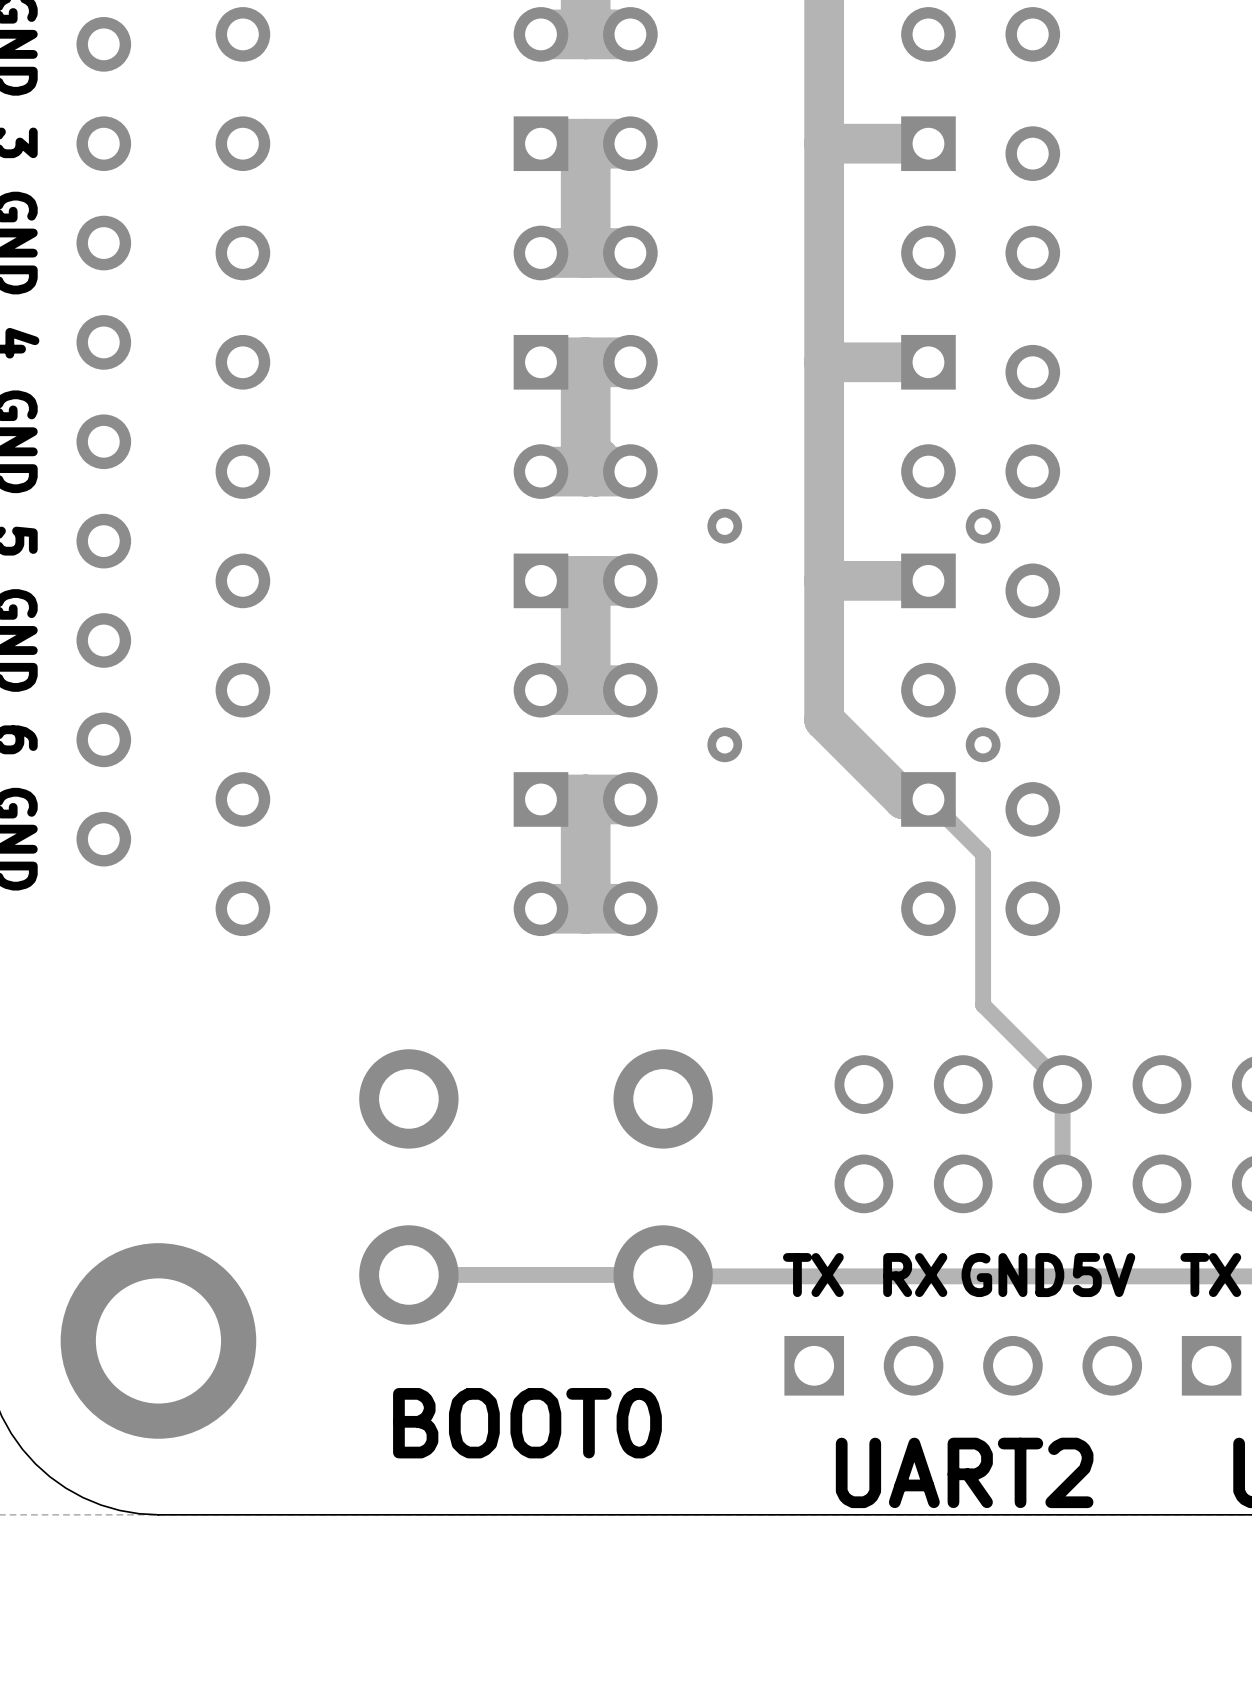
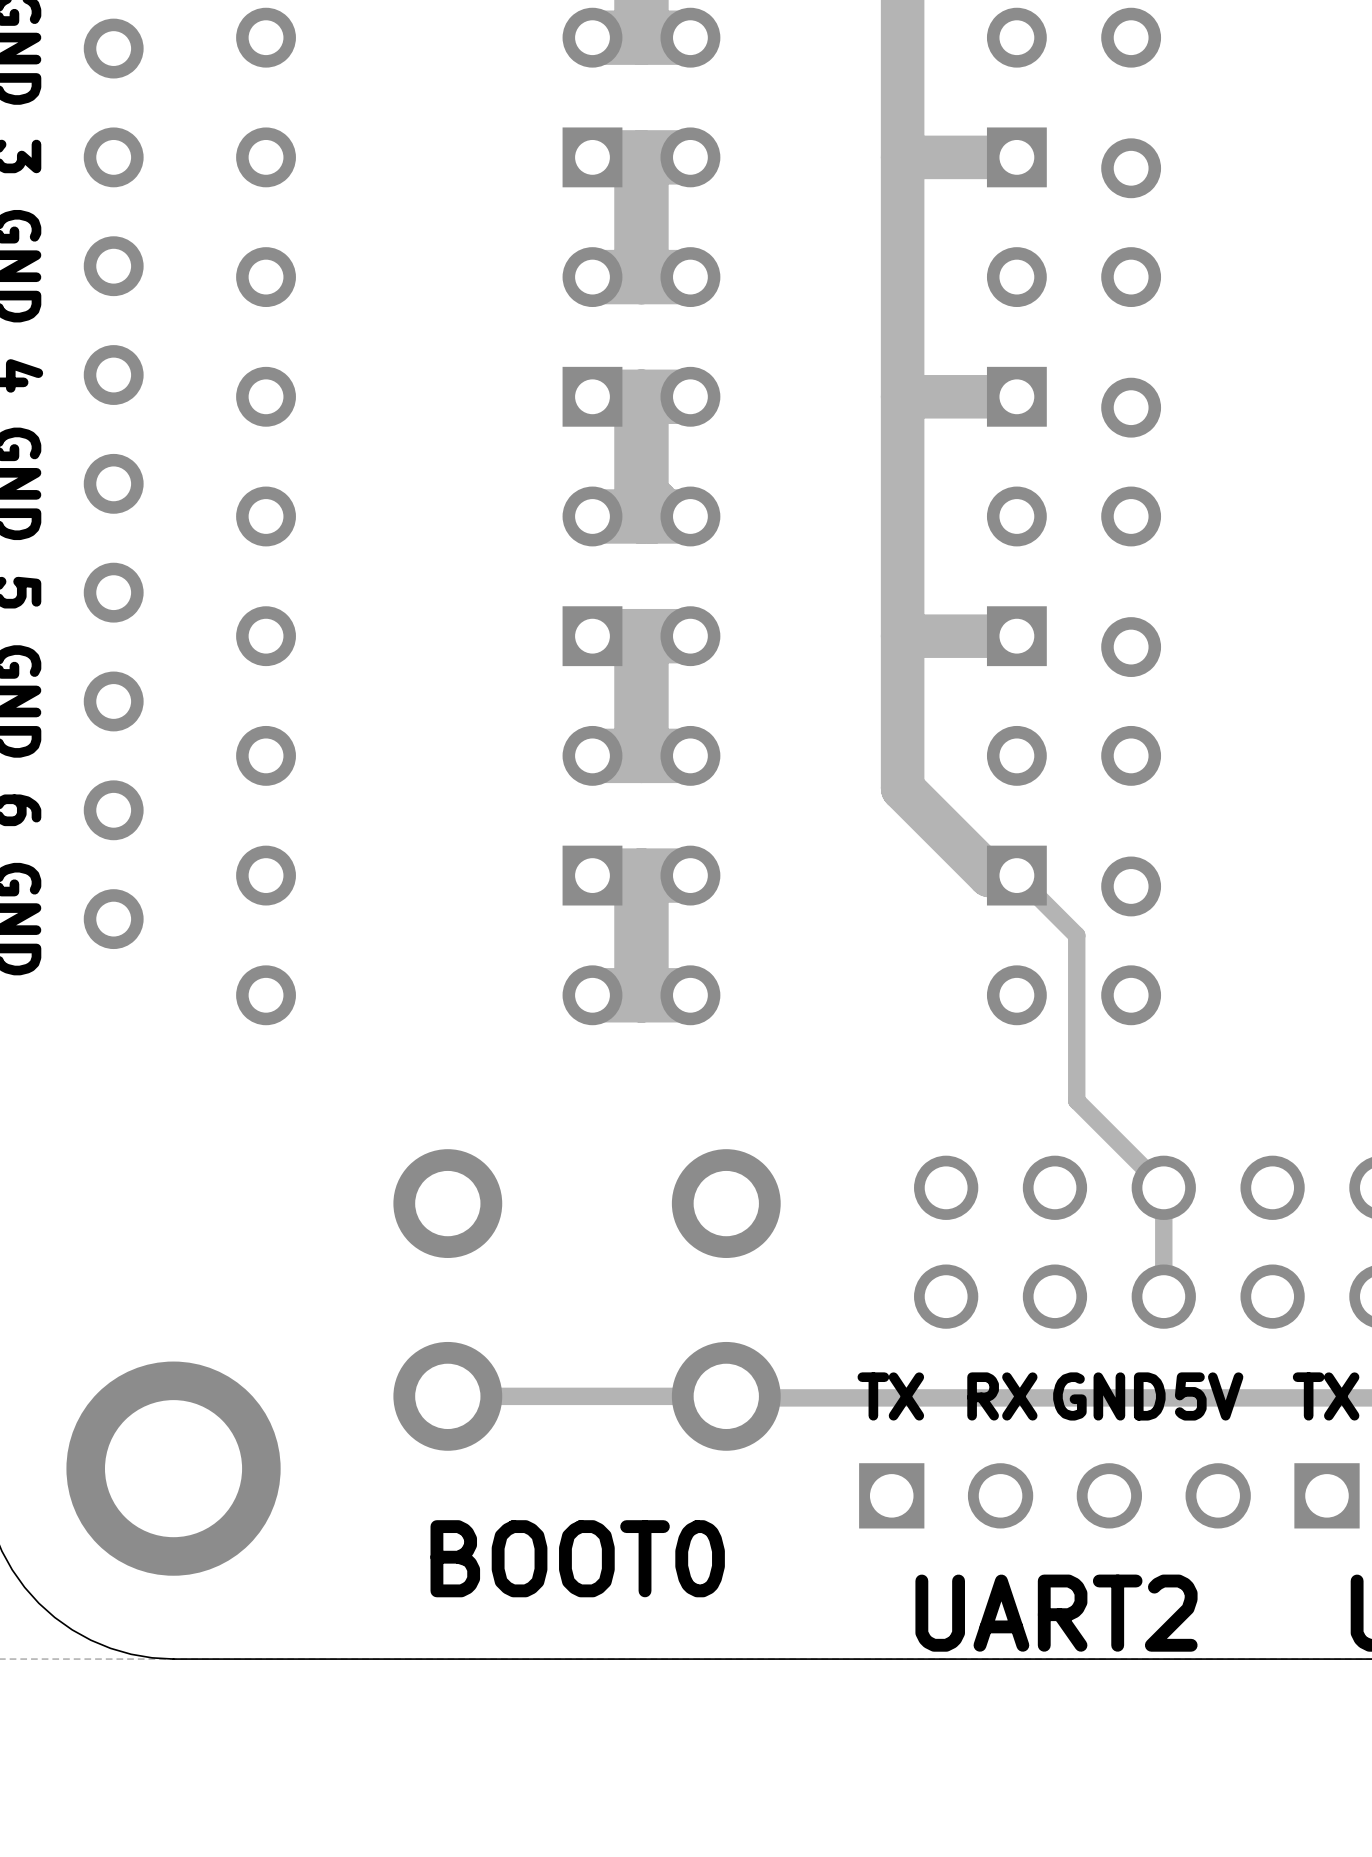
via: (724, 526) -> none
via: (983, 526) -> none
via: (724, 744) -> none
via: (983, 744) -> none

